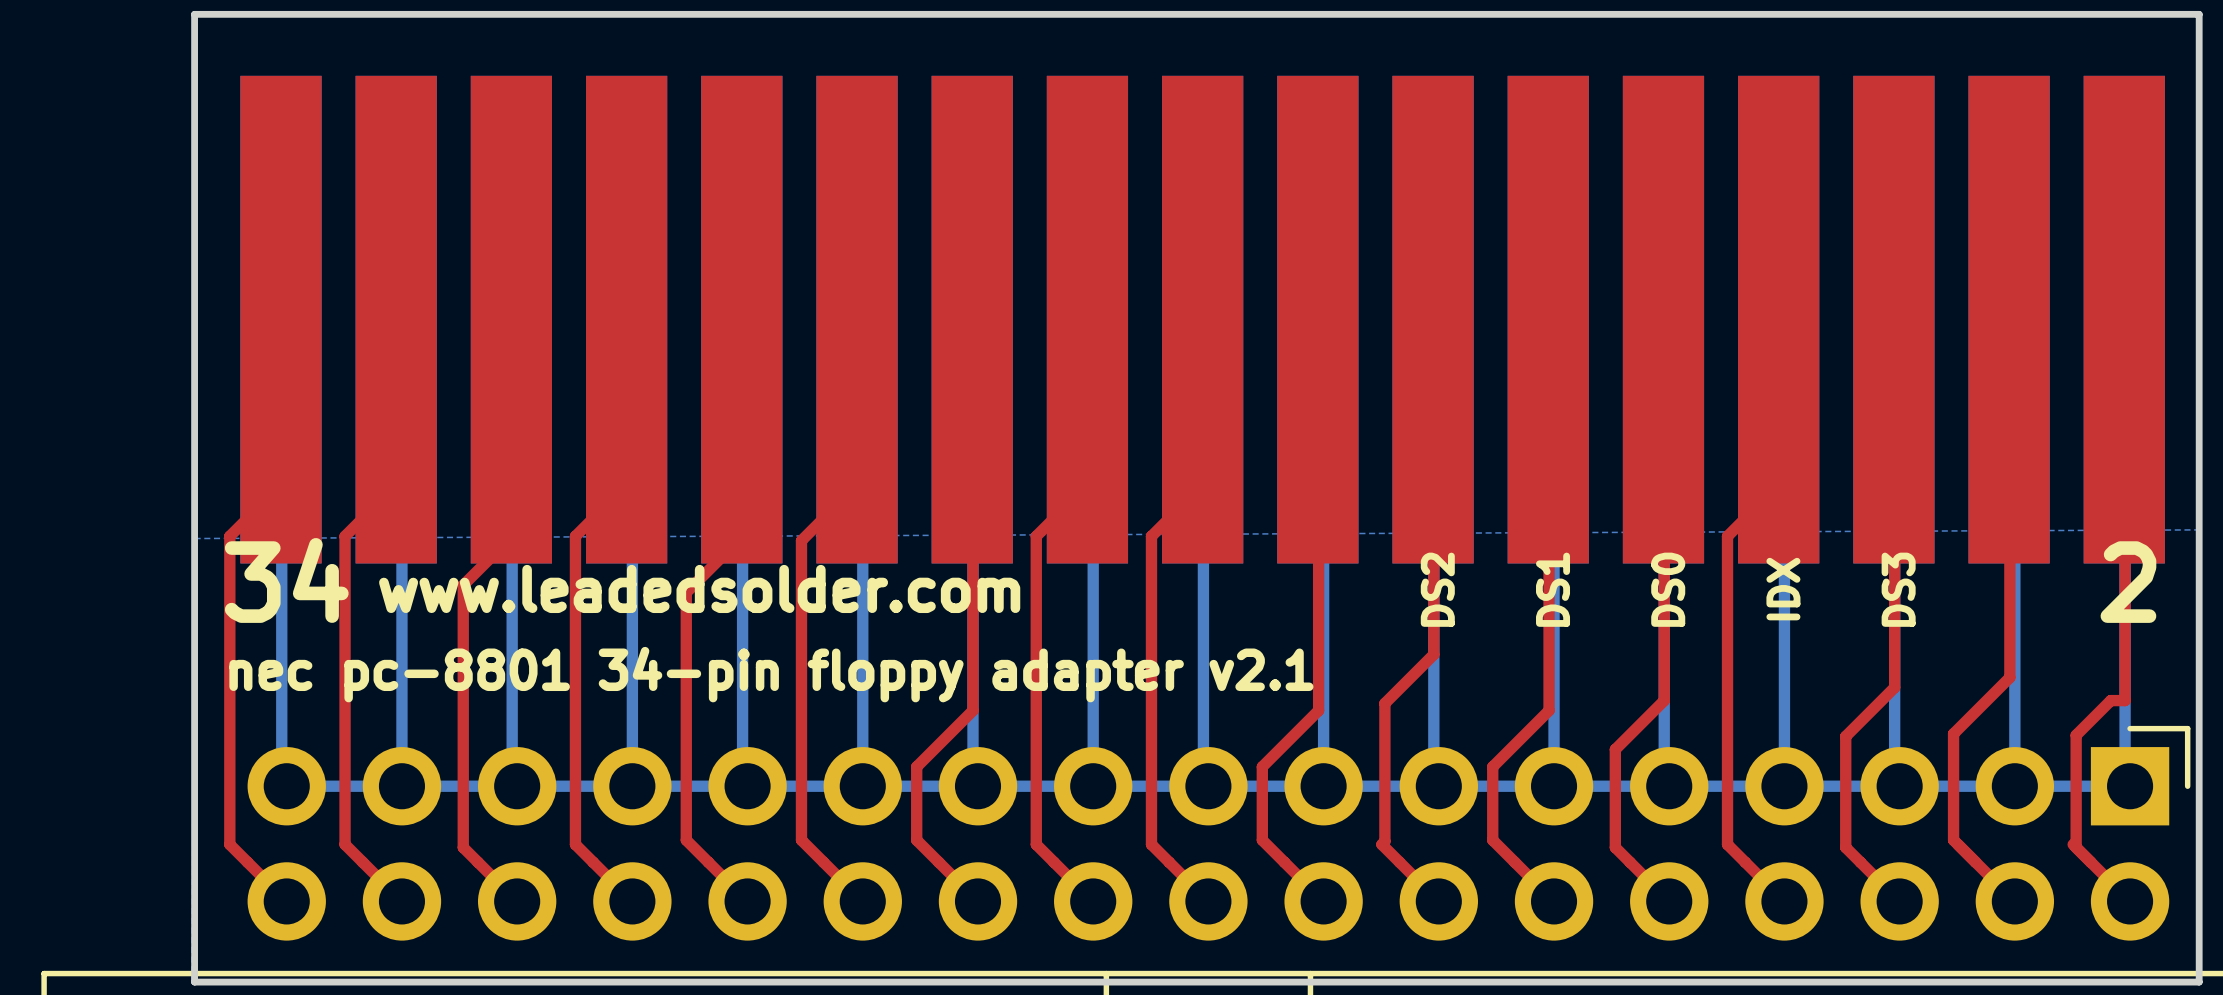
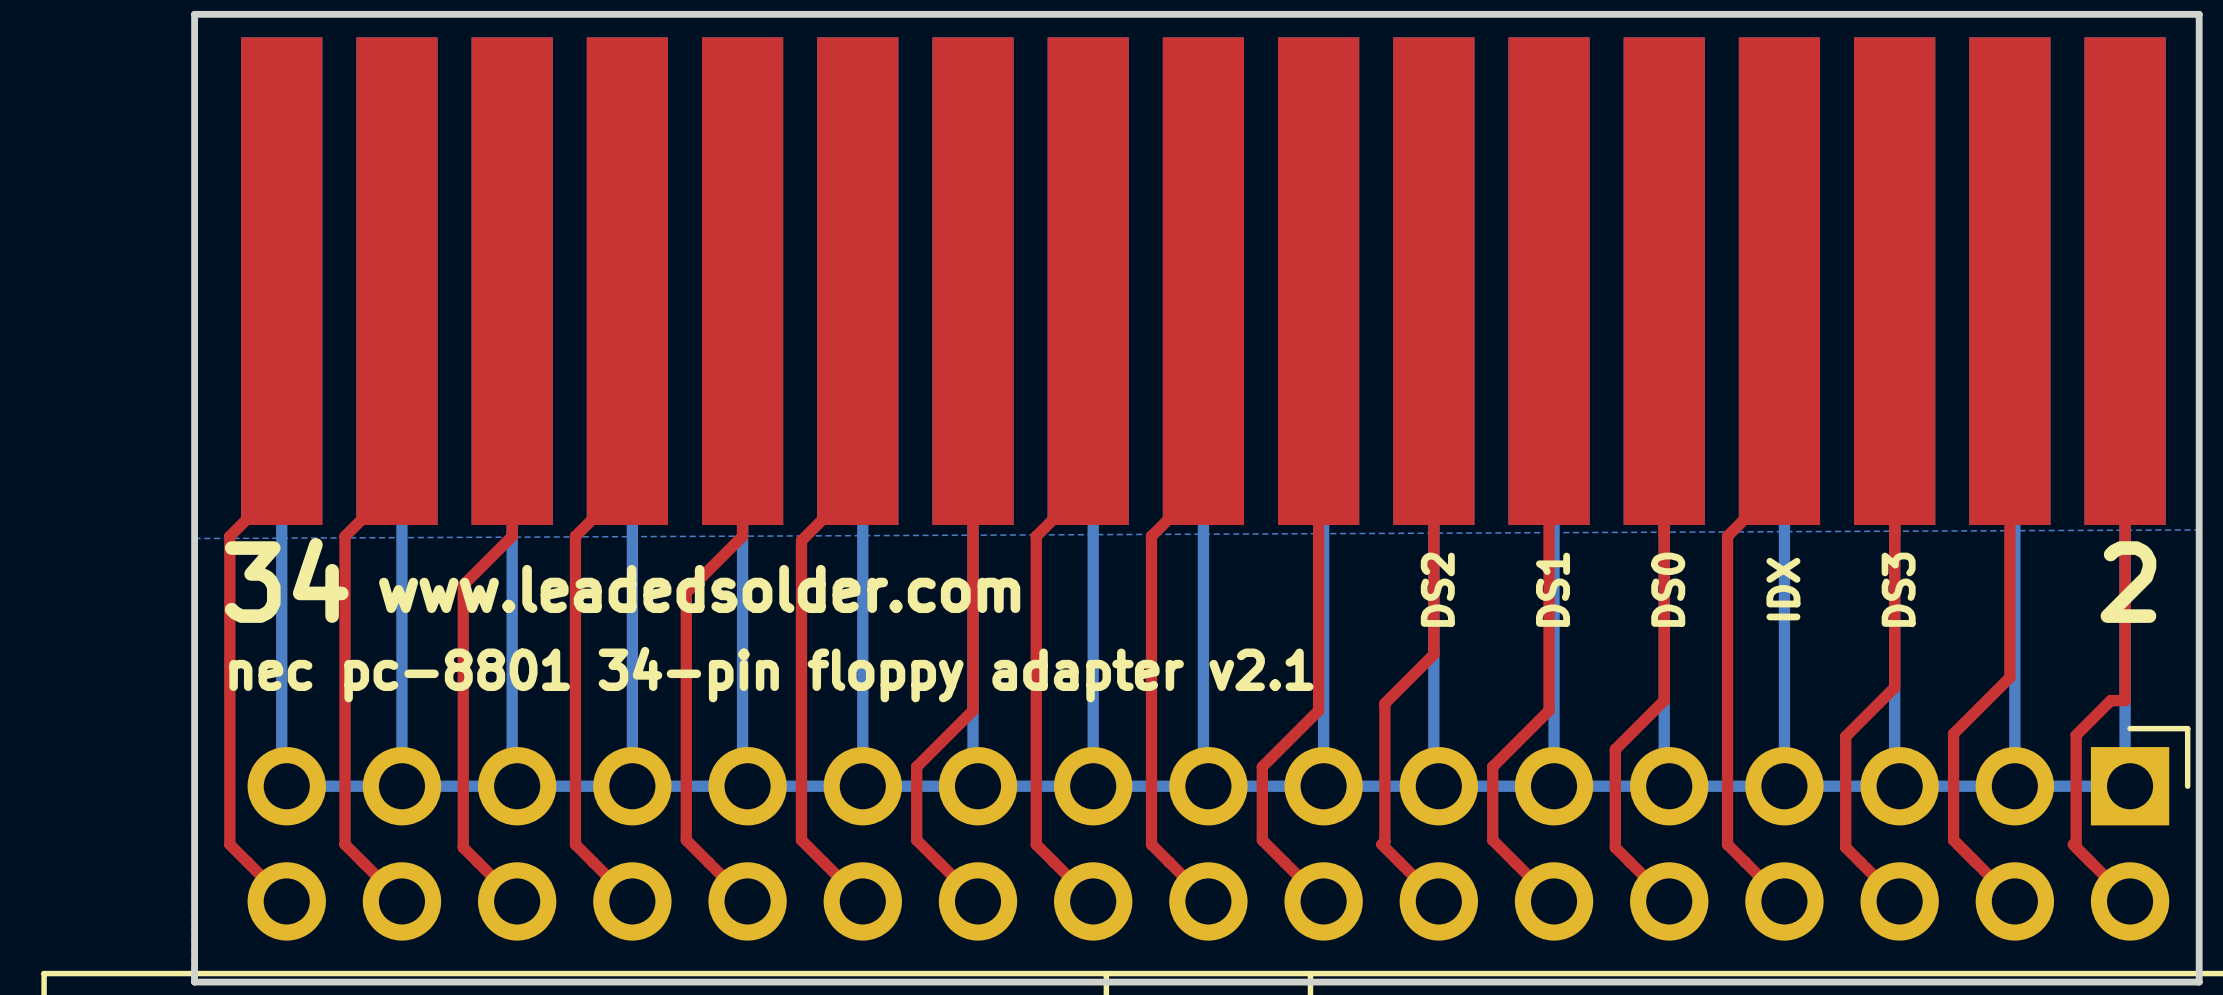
part position: (1202, 319) -> (1203, 281)

